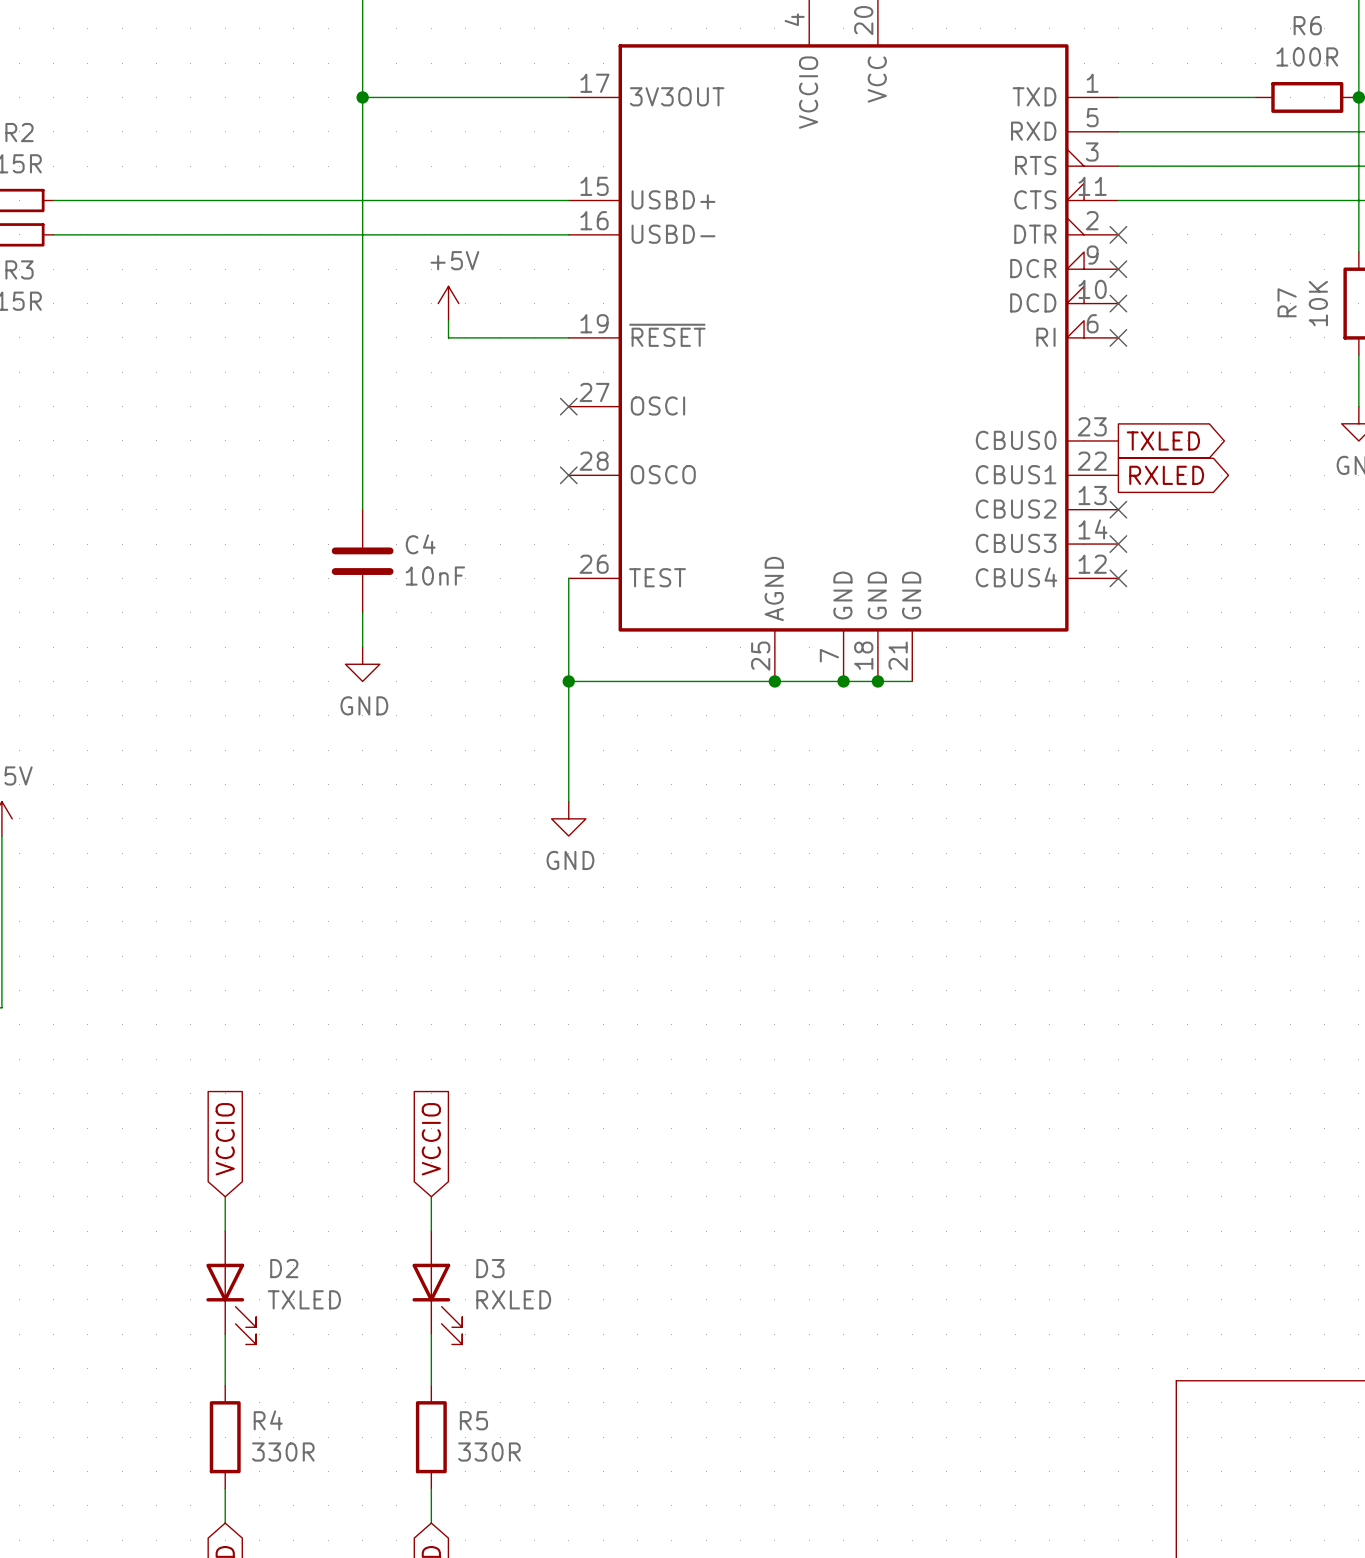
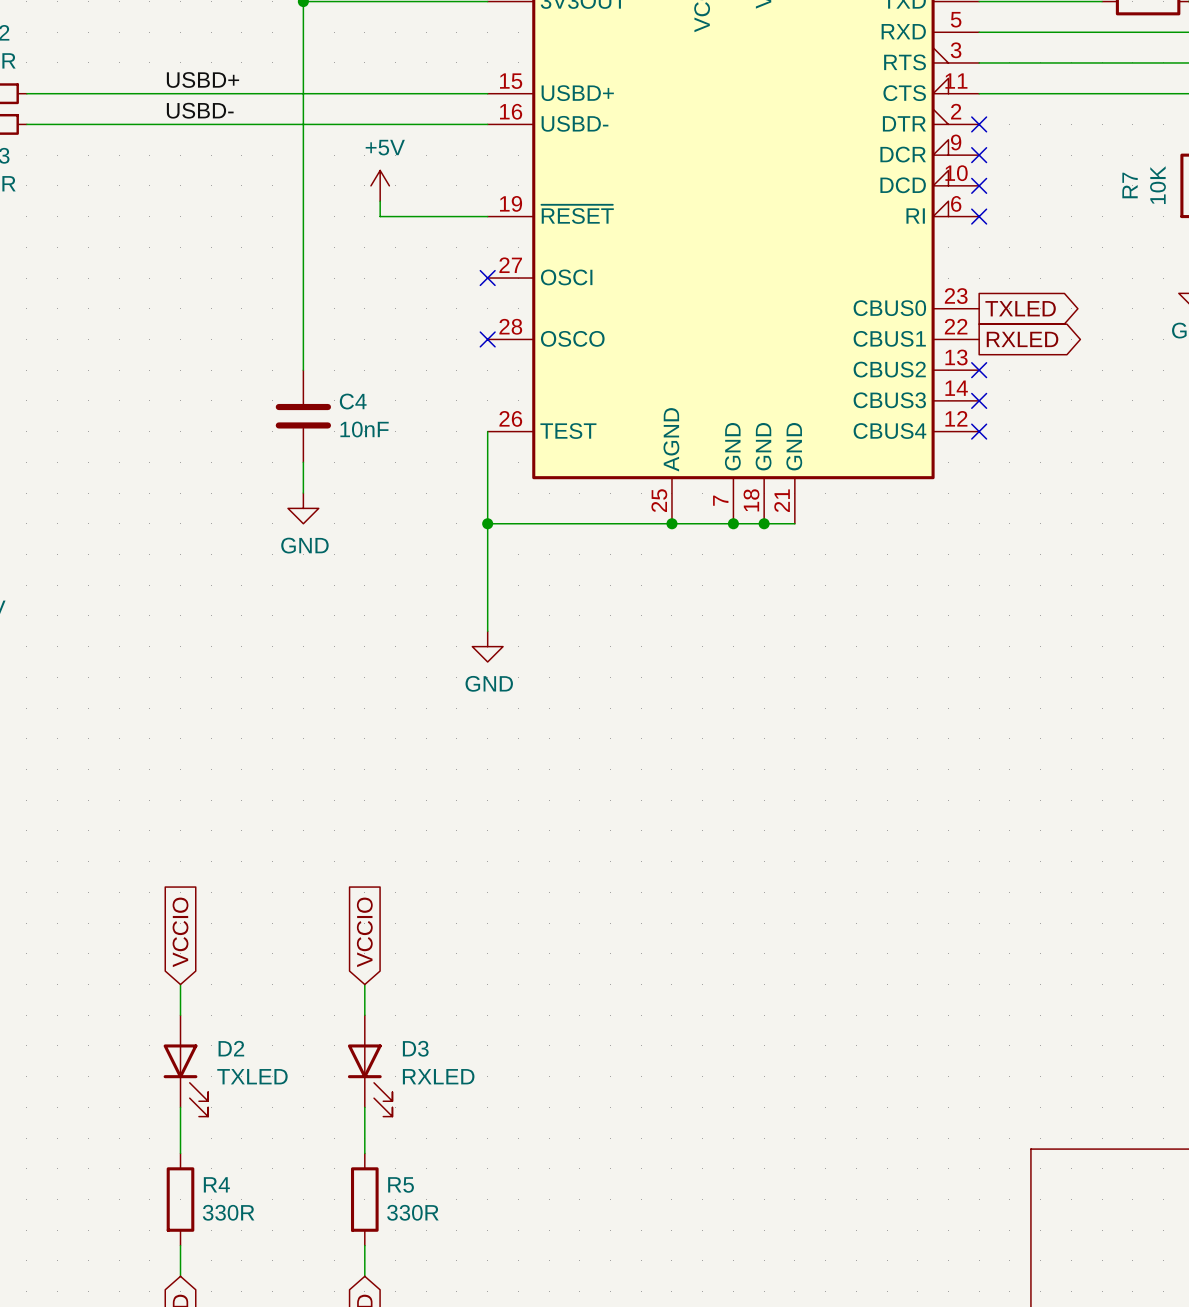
label: none -> USBD+ (202, 79)
label: none -> USBD- (200, 110)

